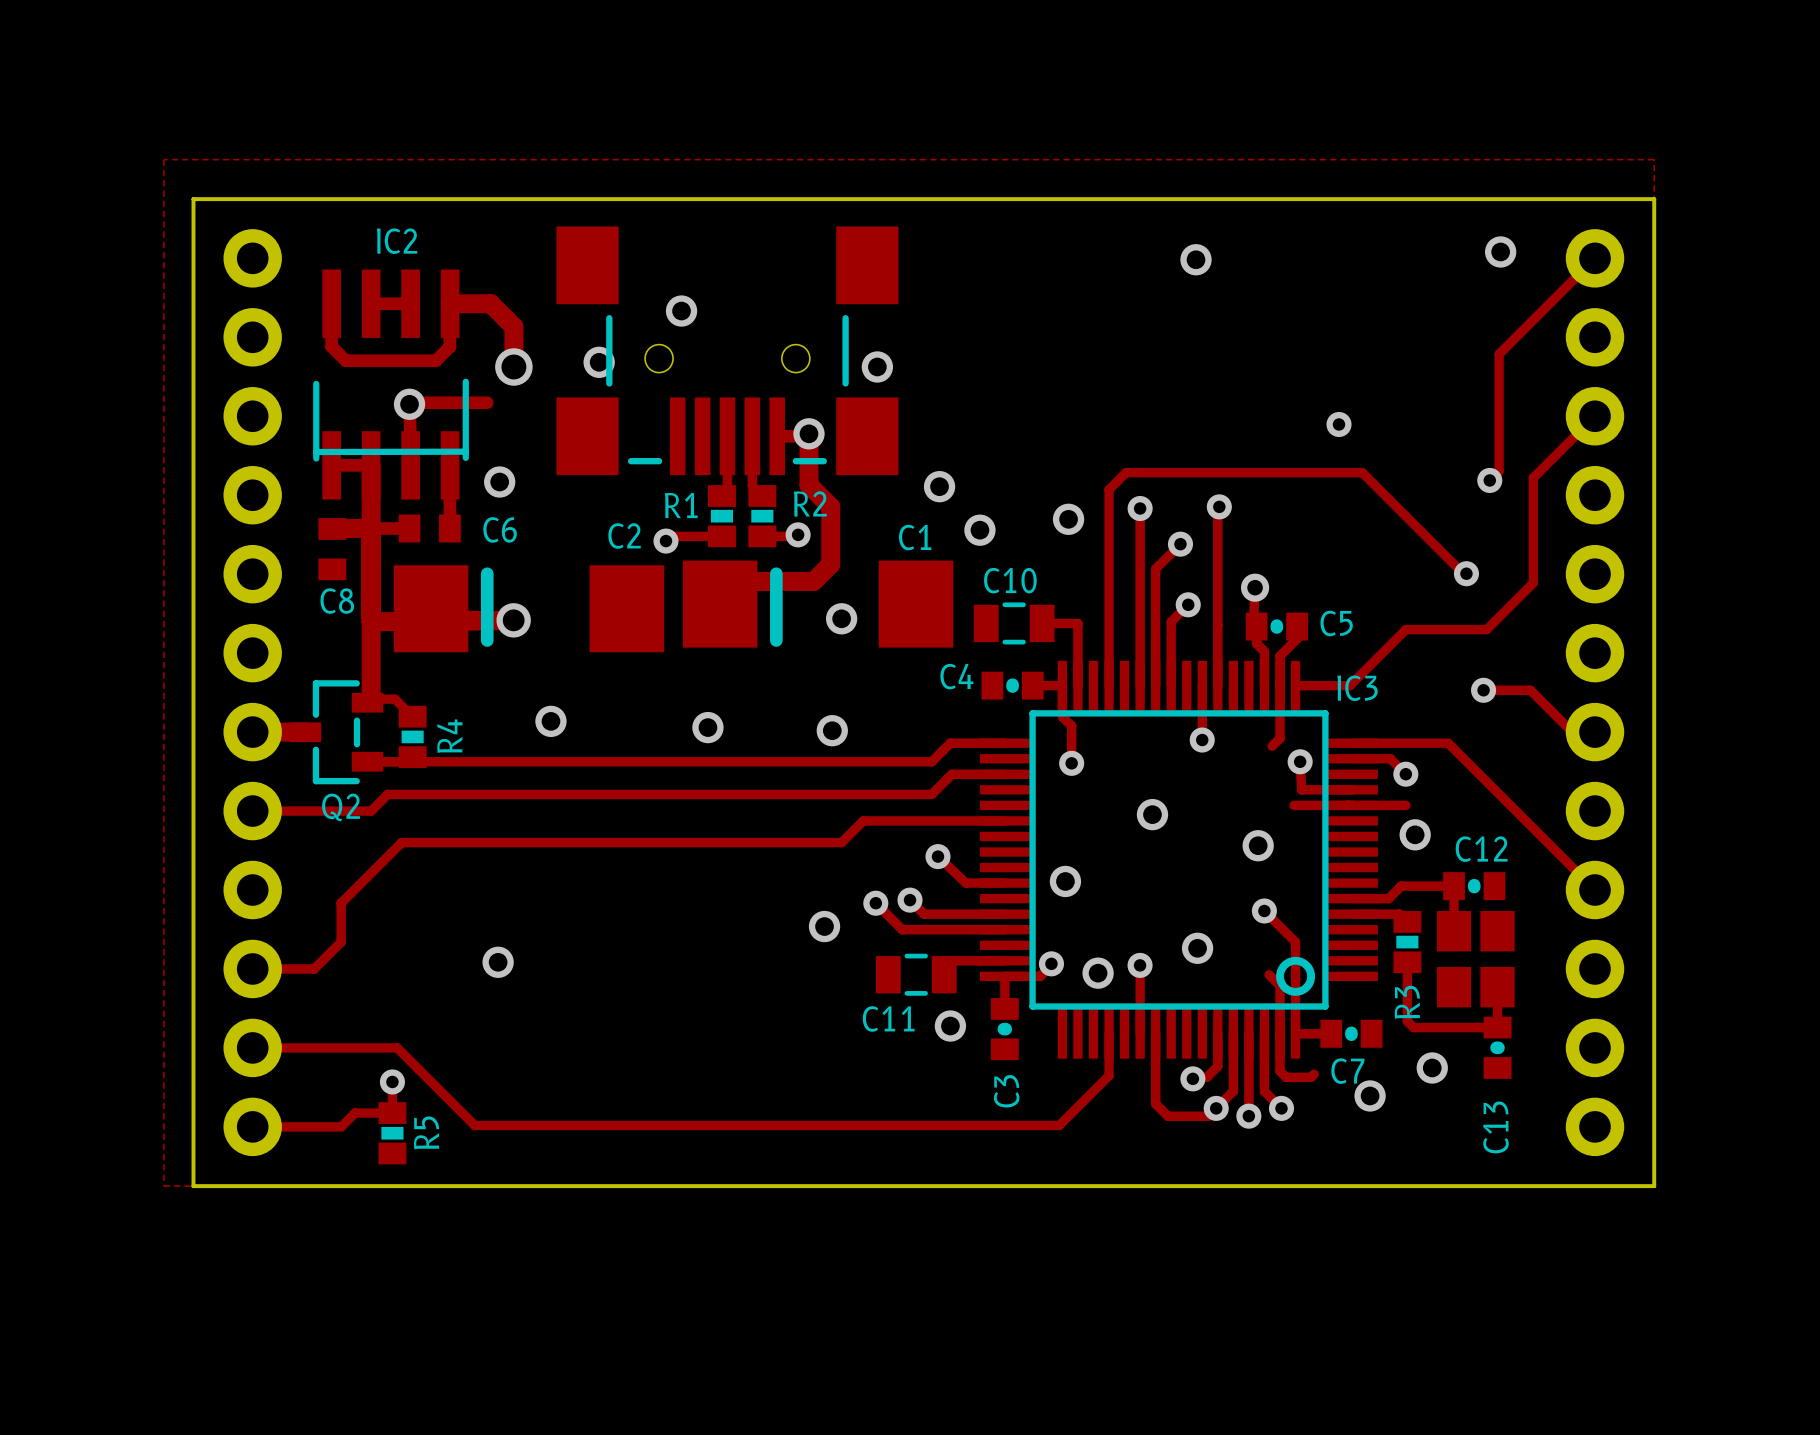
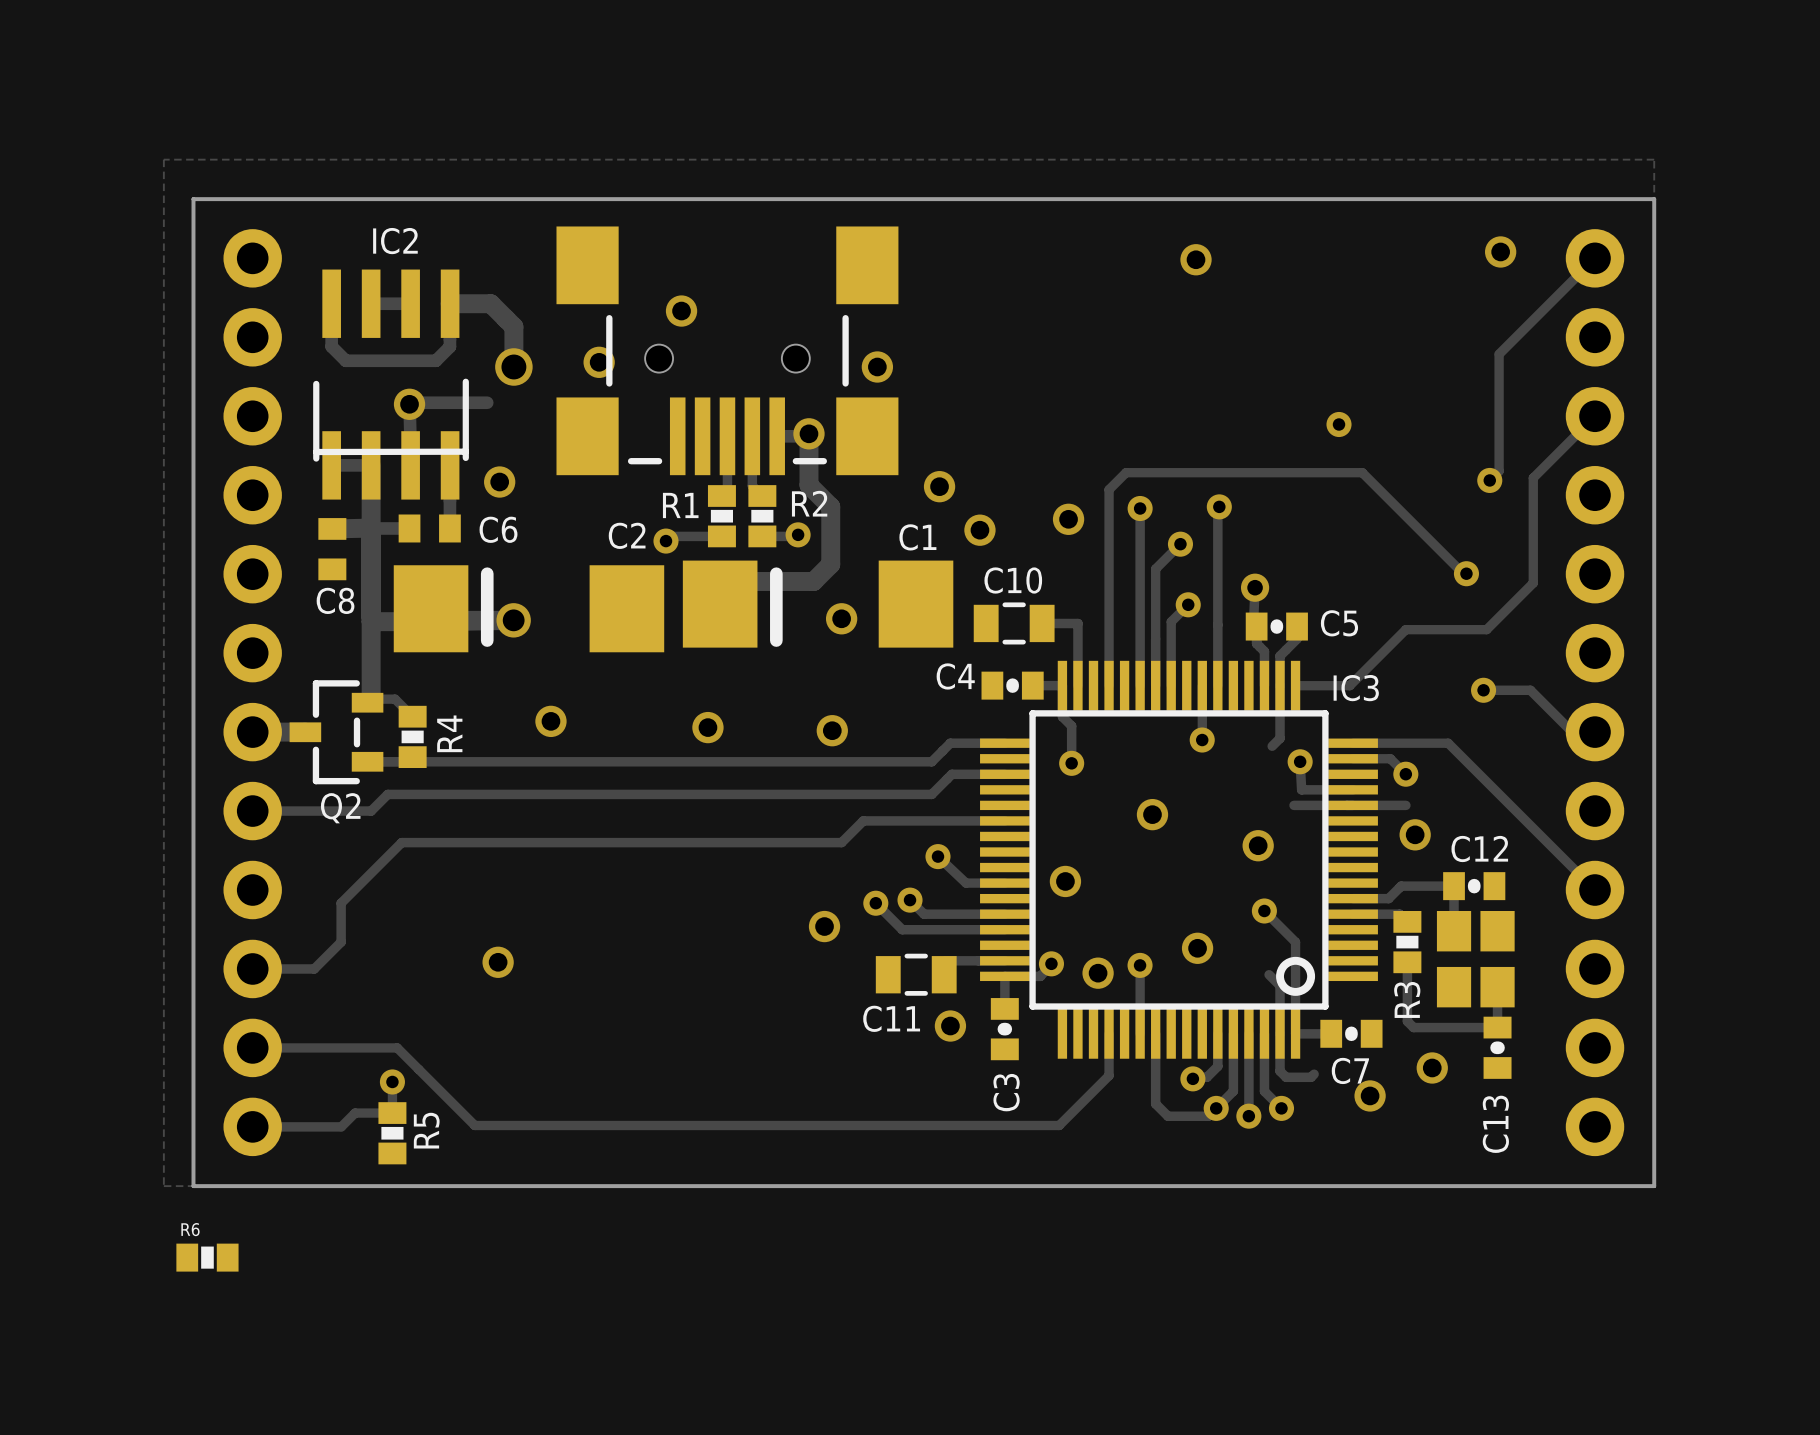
R6: none -> (207, 1257)

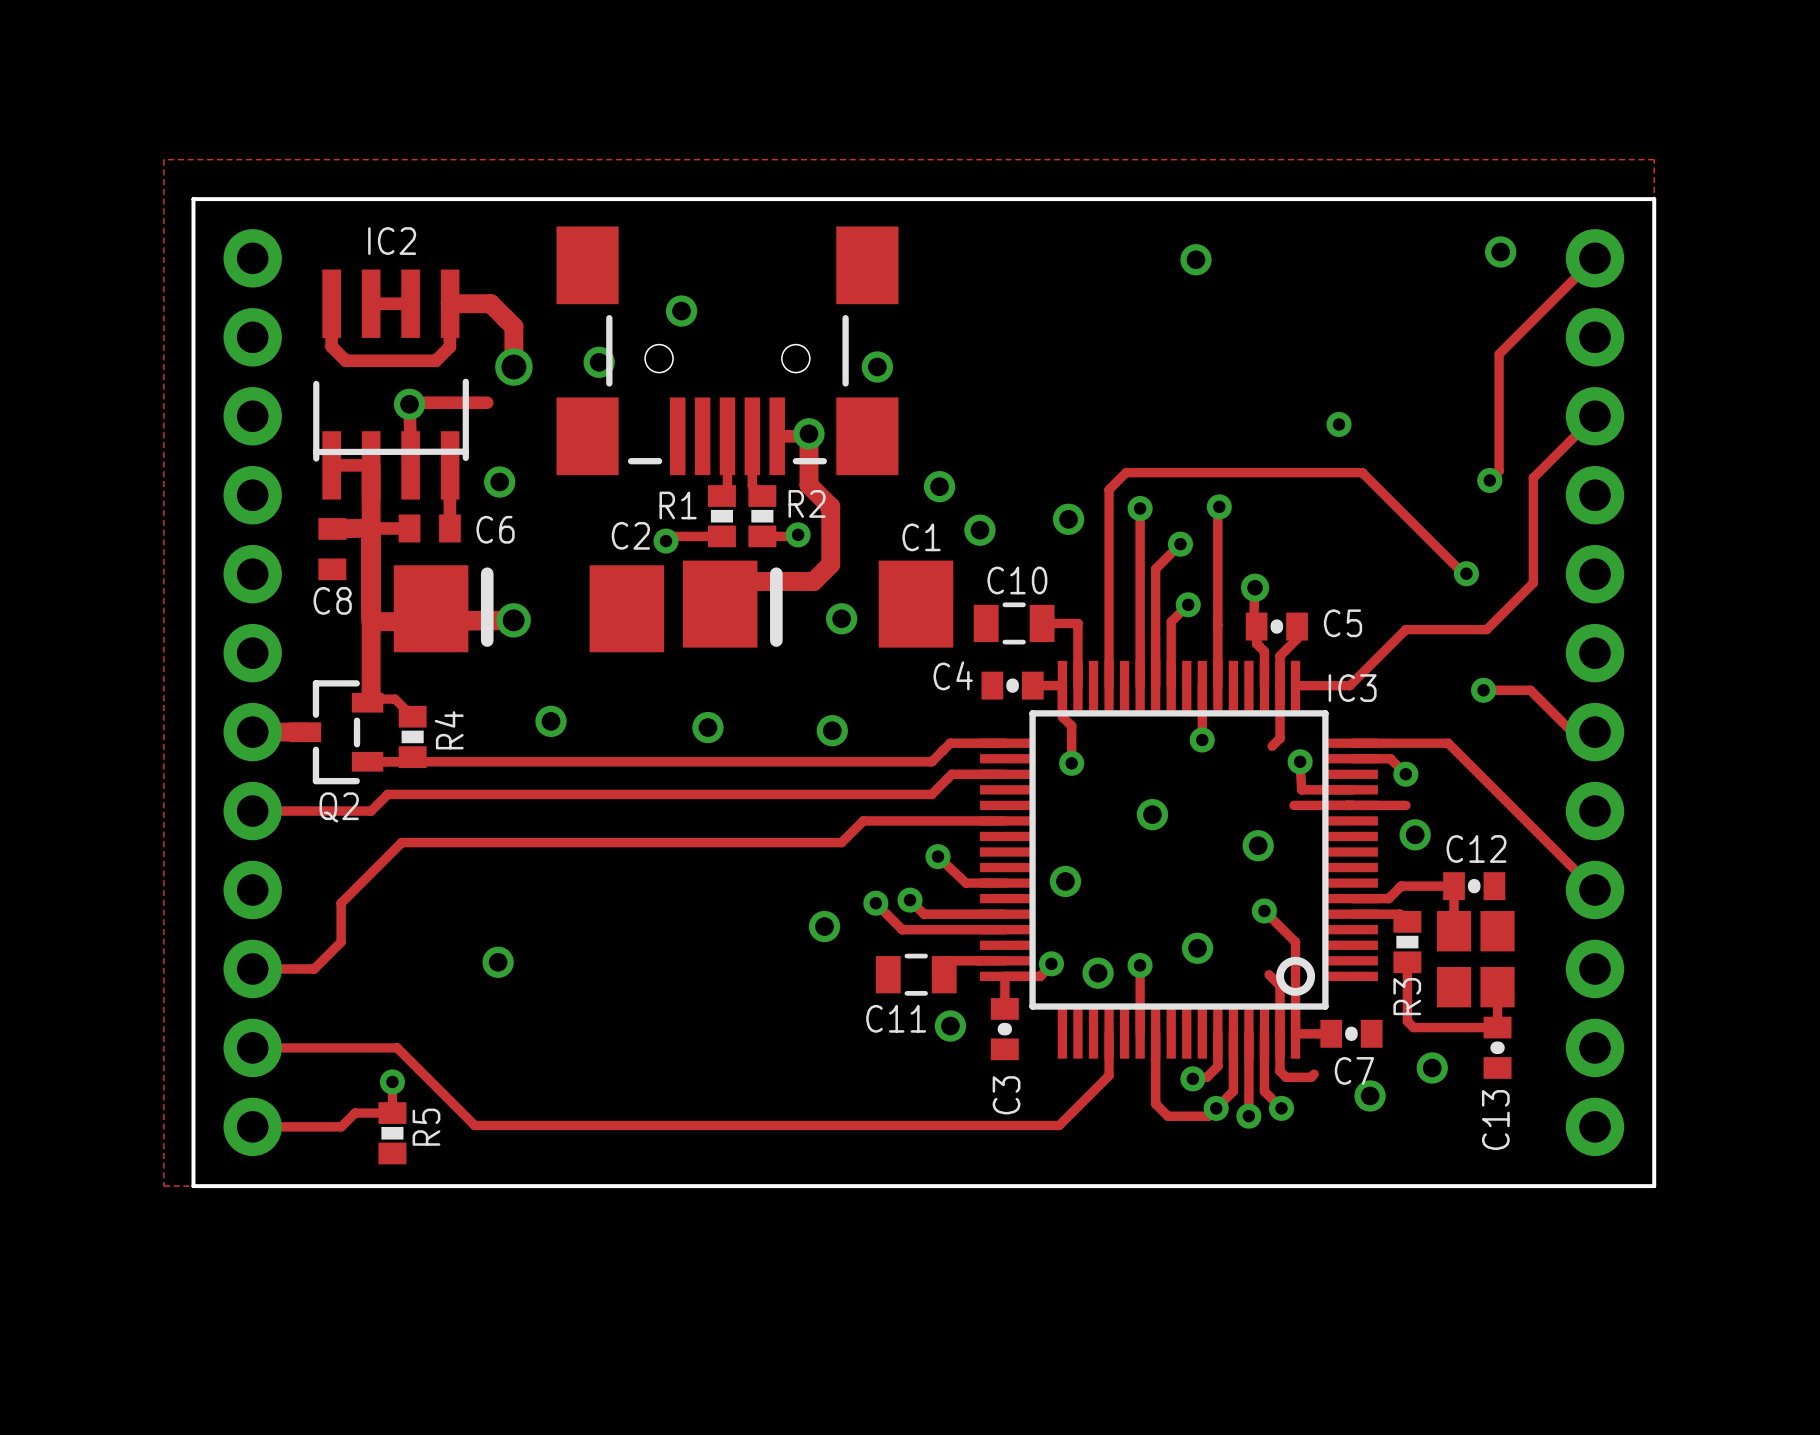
R6: (207, 1257) -> none

